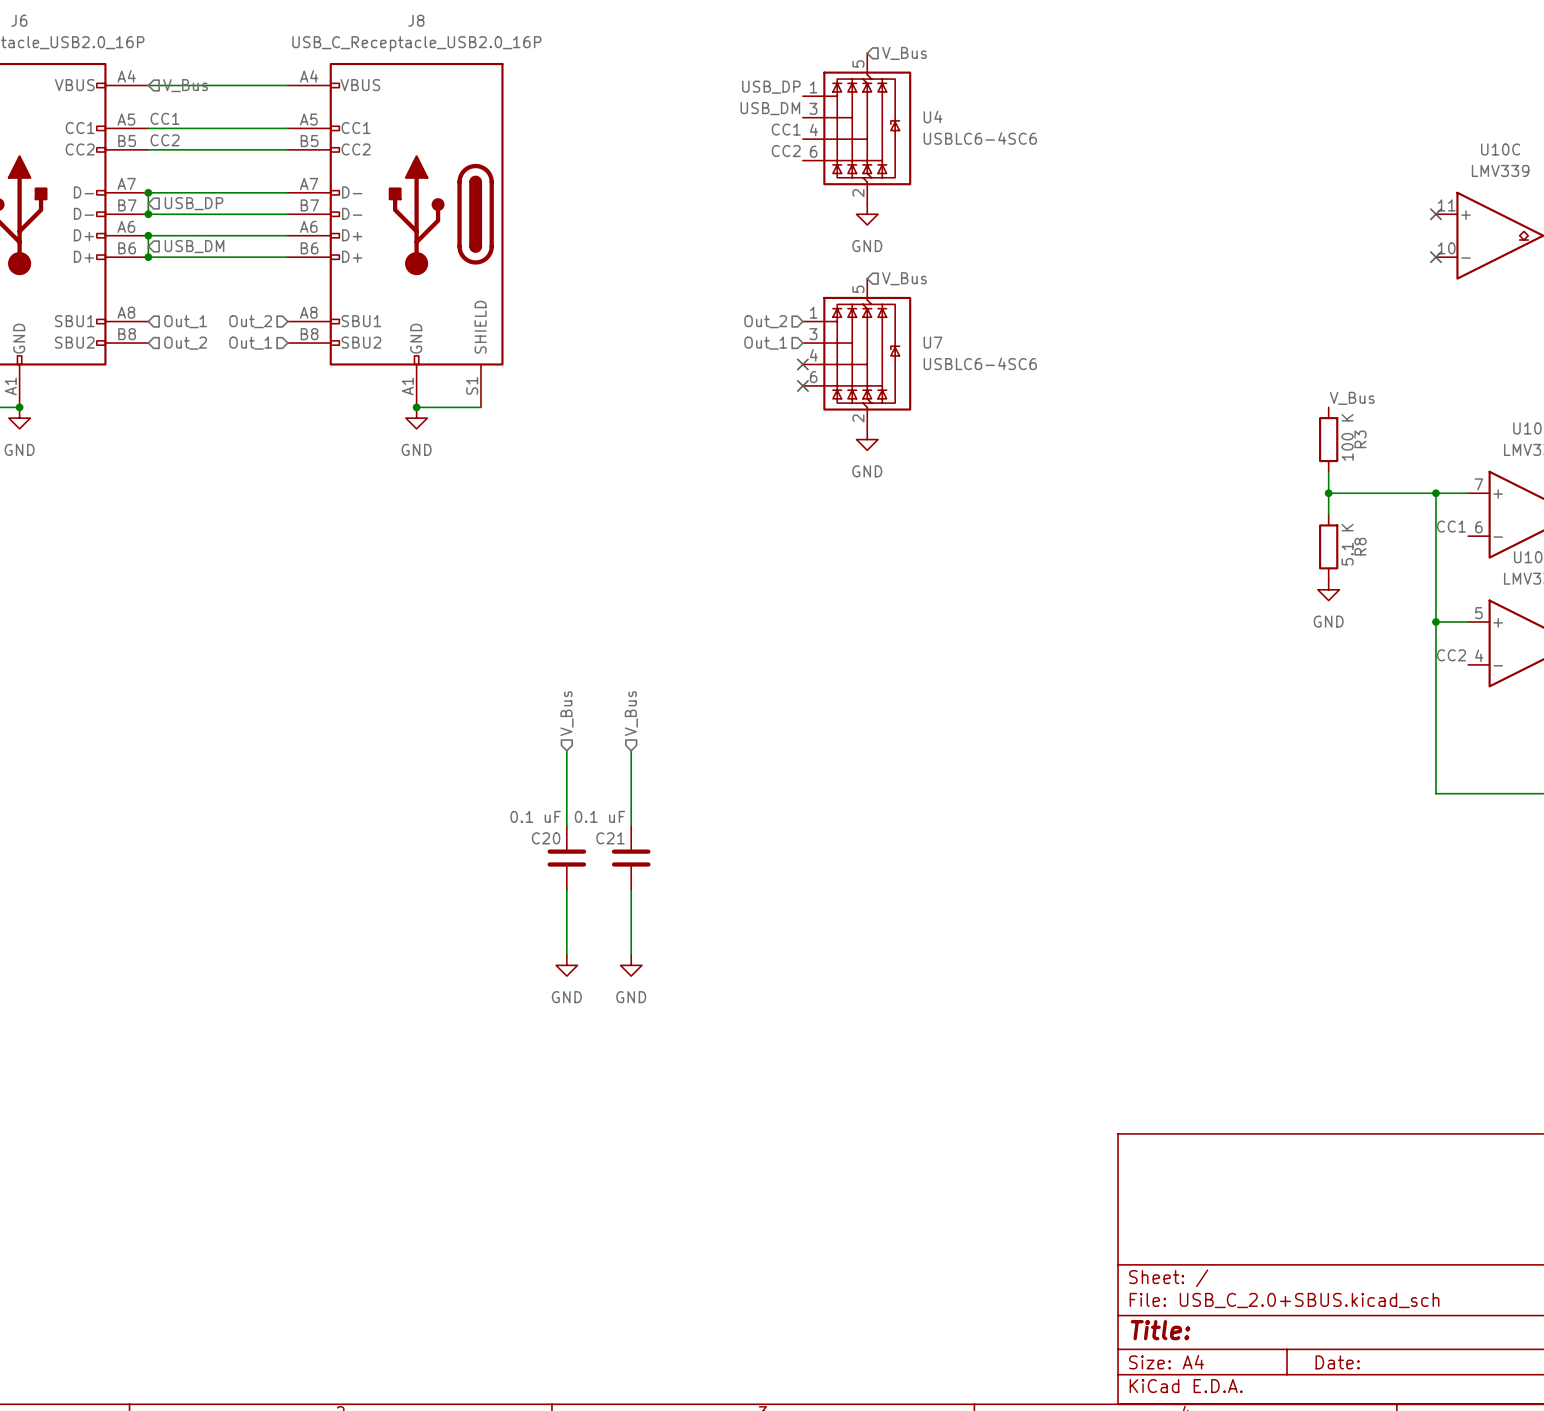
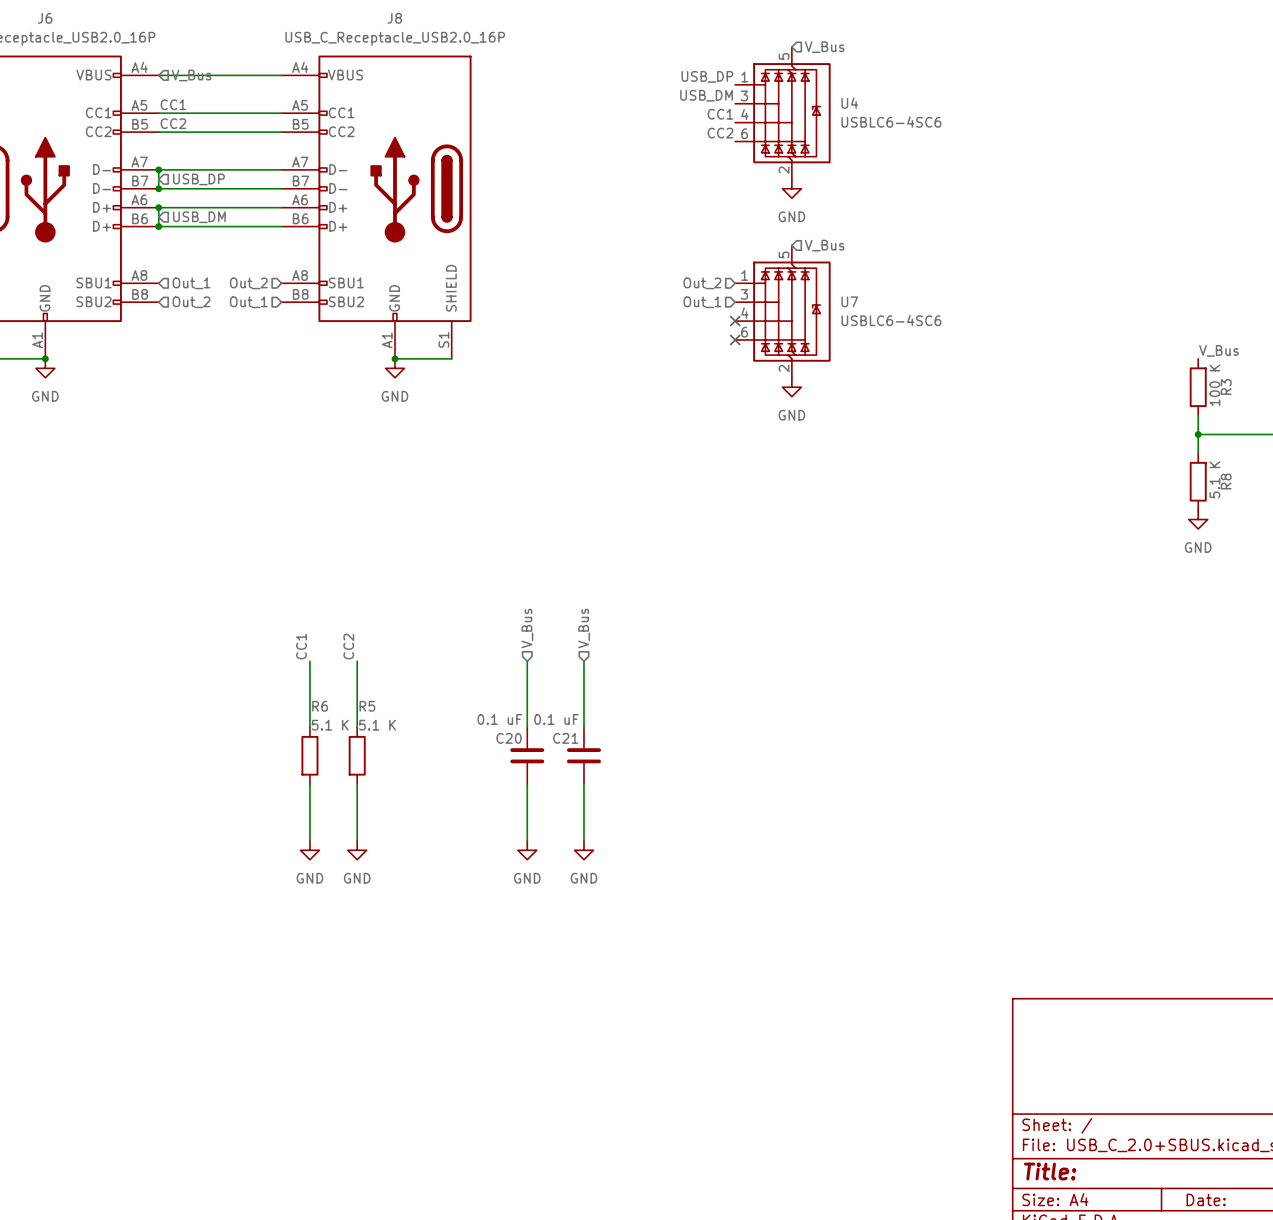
label: none -> CC1 (301, 646)
label: none -> CC2 (348, 646)
wire: none -> (309, 661) (309, 727)
wire: none -> (357, 661) (357, 727)
R6: none -> 5.1 K (309, 755)
R5: none -> 5.1 K (357, 755)
wire: none -> (309, 784) (309, 840)
wire: none -> (357, 784) (357, 840)
power symbol: none -> GND (309, 850)
power symbol: none -> GND (357, 850)

